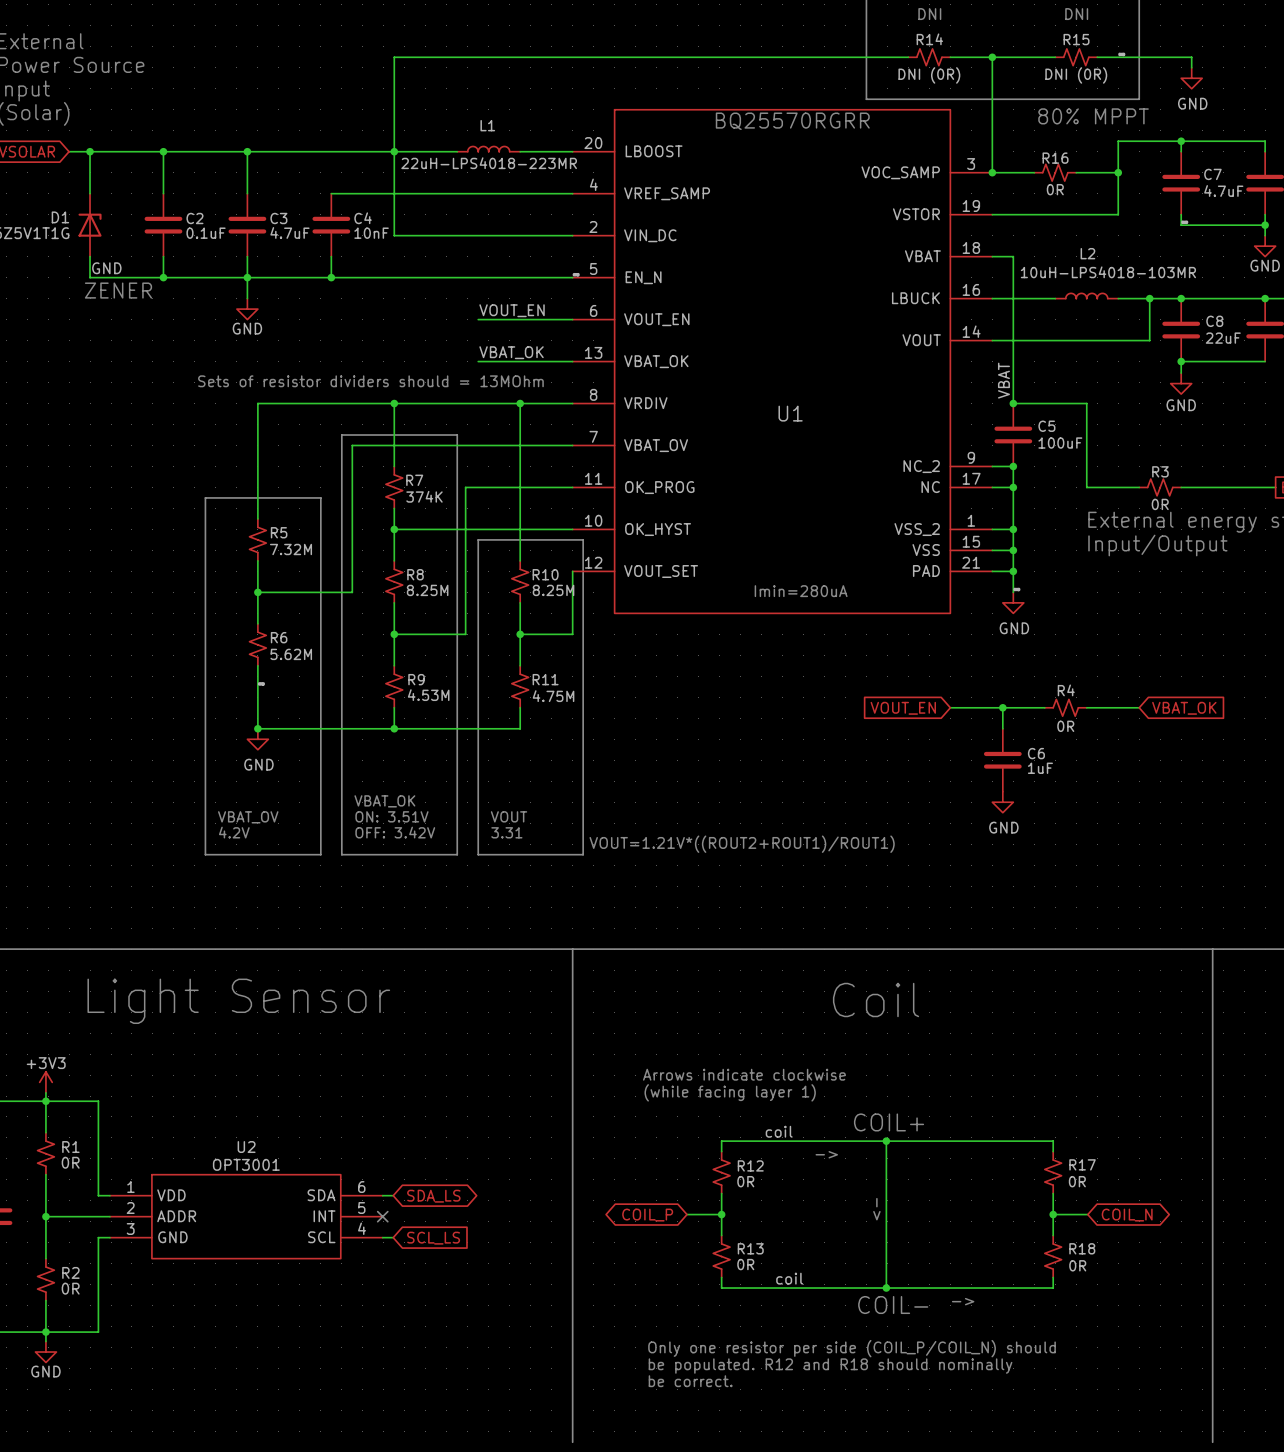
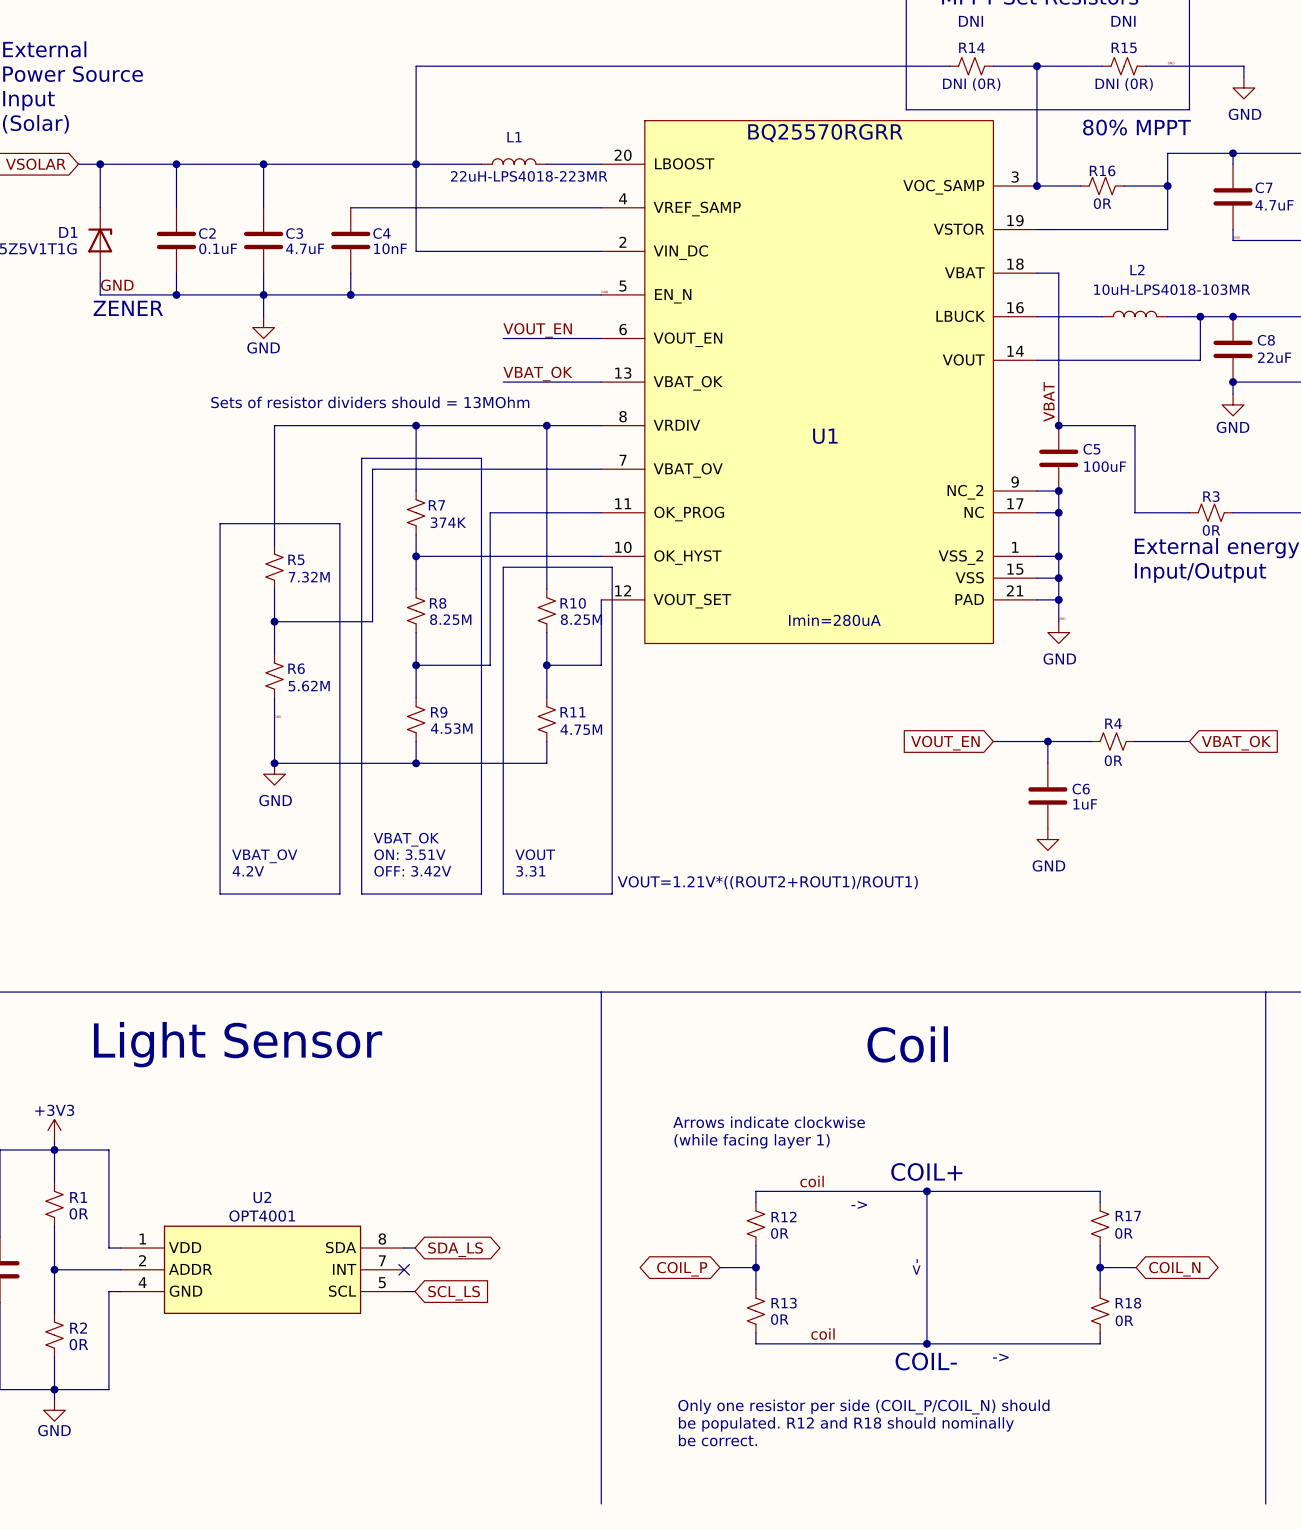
U2 value: OPT3001 (246, 1164) -> OPT4001 (262, 1216)
U2 pin number: 6 (361, 1187) -> 8 (382, 1239)
U2 pin number: 5 (361, 1208) -> 7 (382, 1260)
U2 pin number: 3 (130, 1228) -> 4 (142, 1282)
U2 pin number: 4 (362, 1228) -> 5 (382, 1282)

